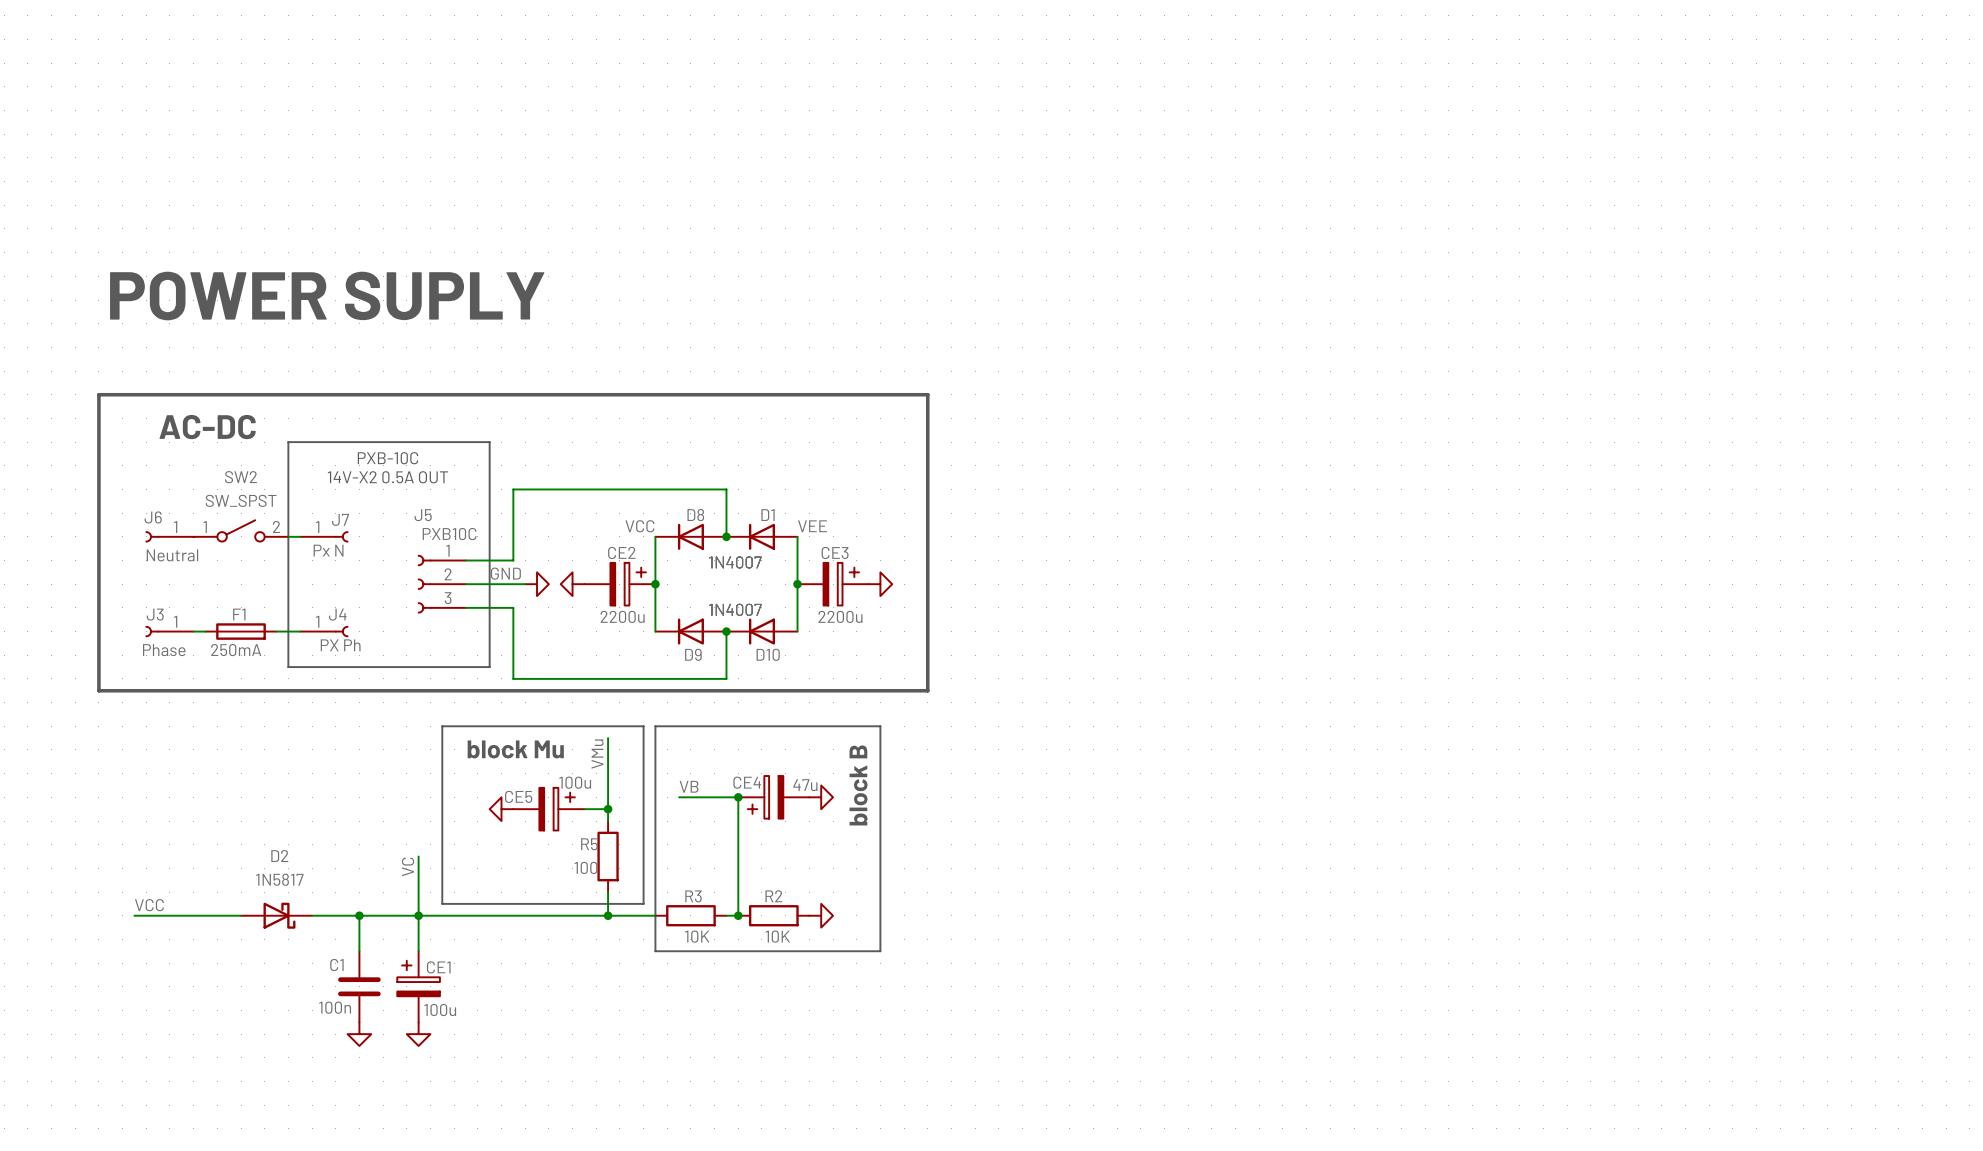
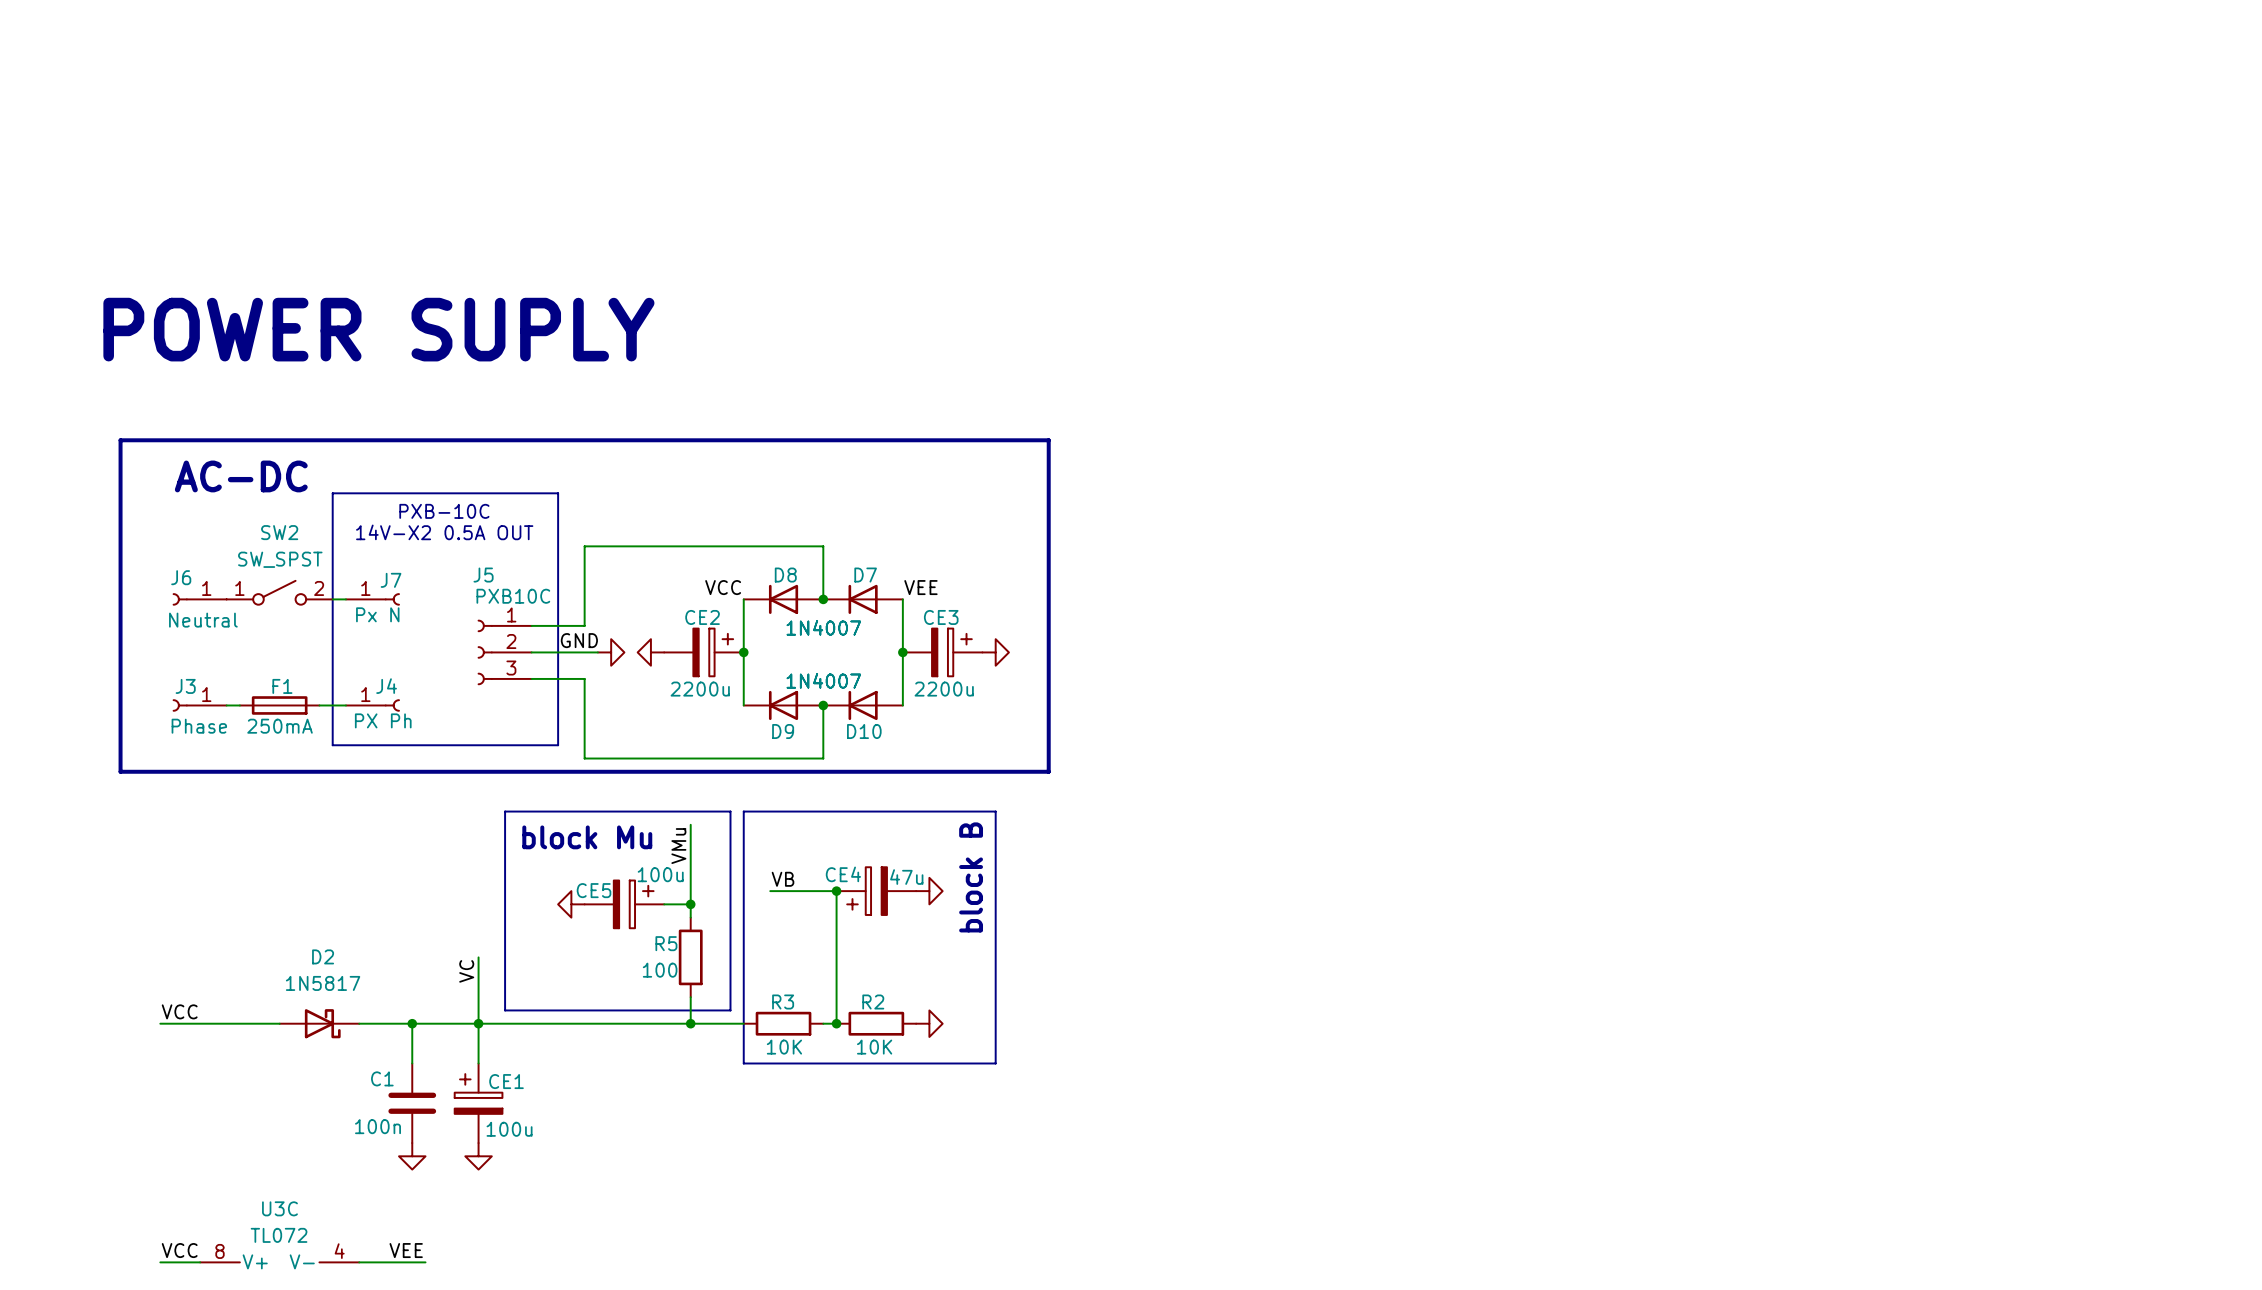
D1 name: D1 (768, 515) -> D7 (865, 575)
label: none -> VCC (179, 1250)
label: none -> VEE (406, 1250)
wire: none -> (160, 1262) (200, 1262)
U3C: none -> TL072 (279, 1262)
wire: none -> (359, 1262) (425, 1262)

